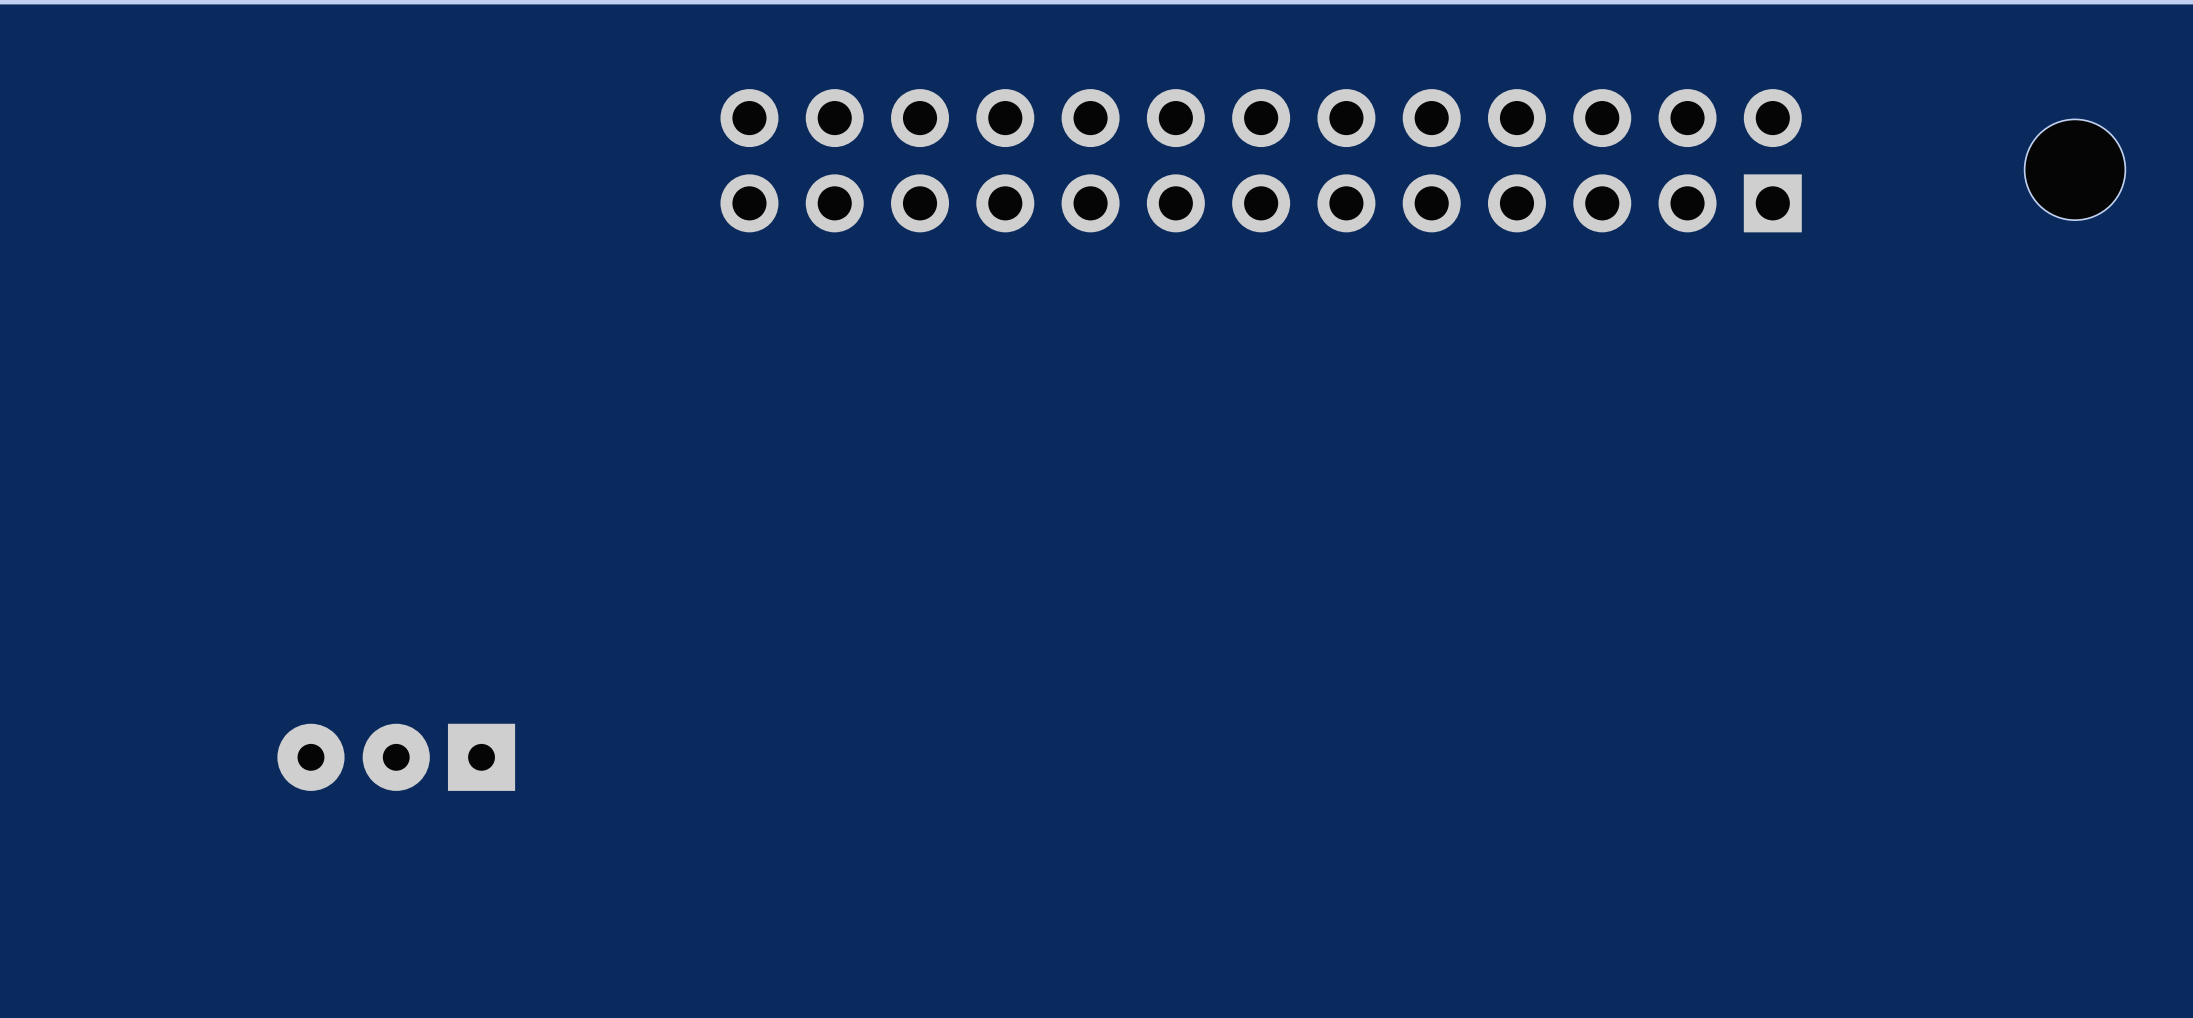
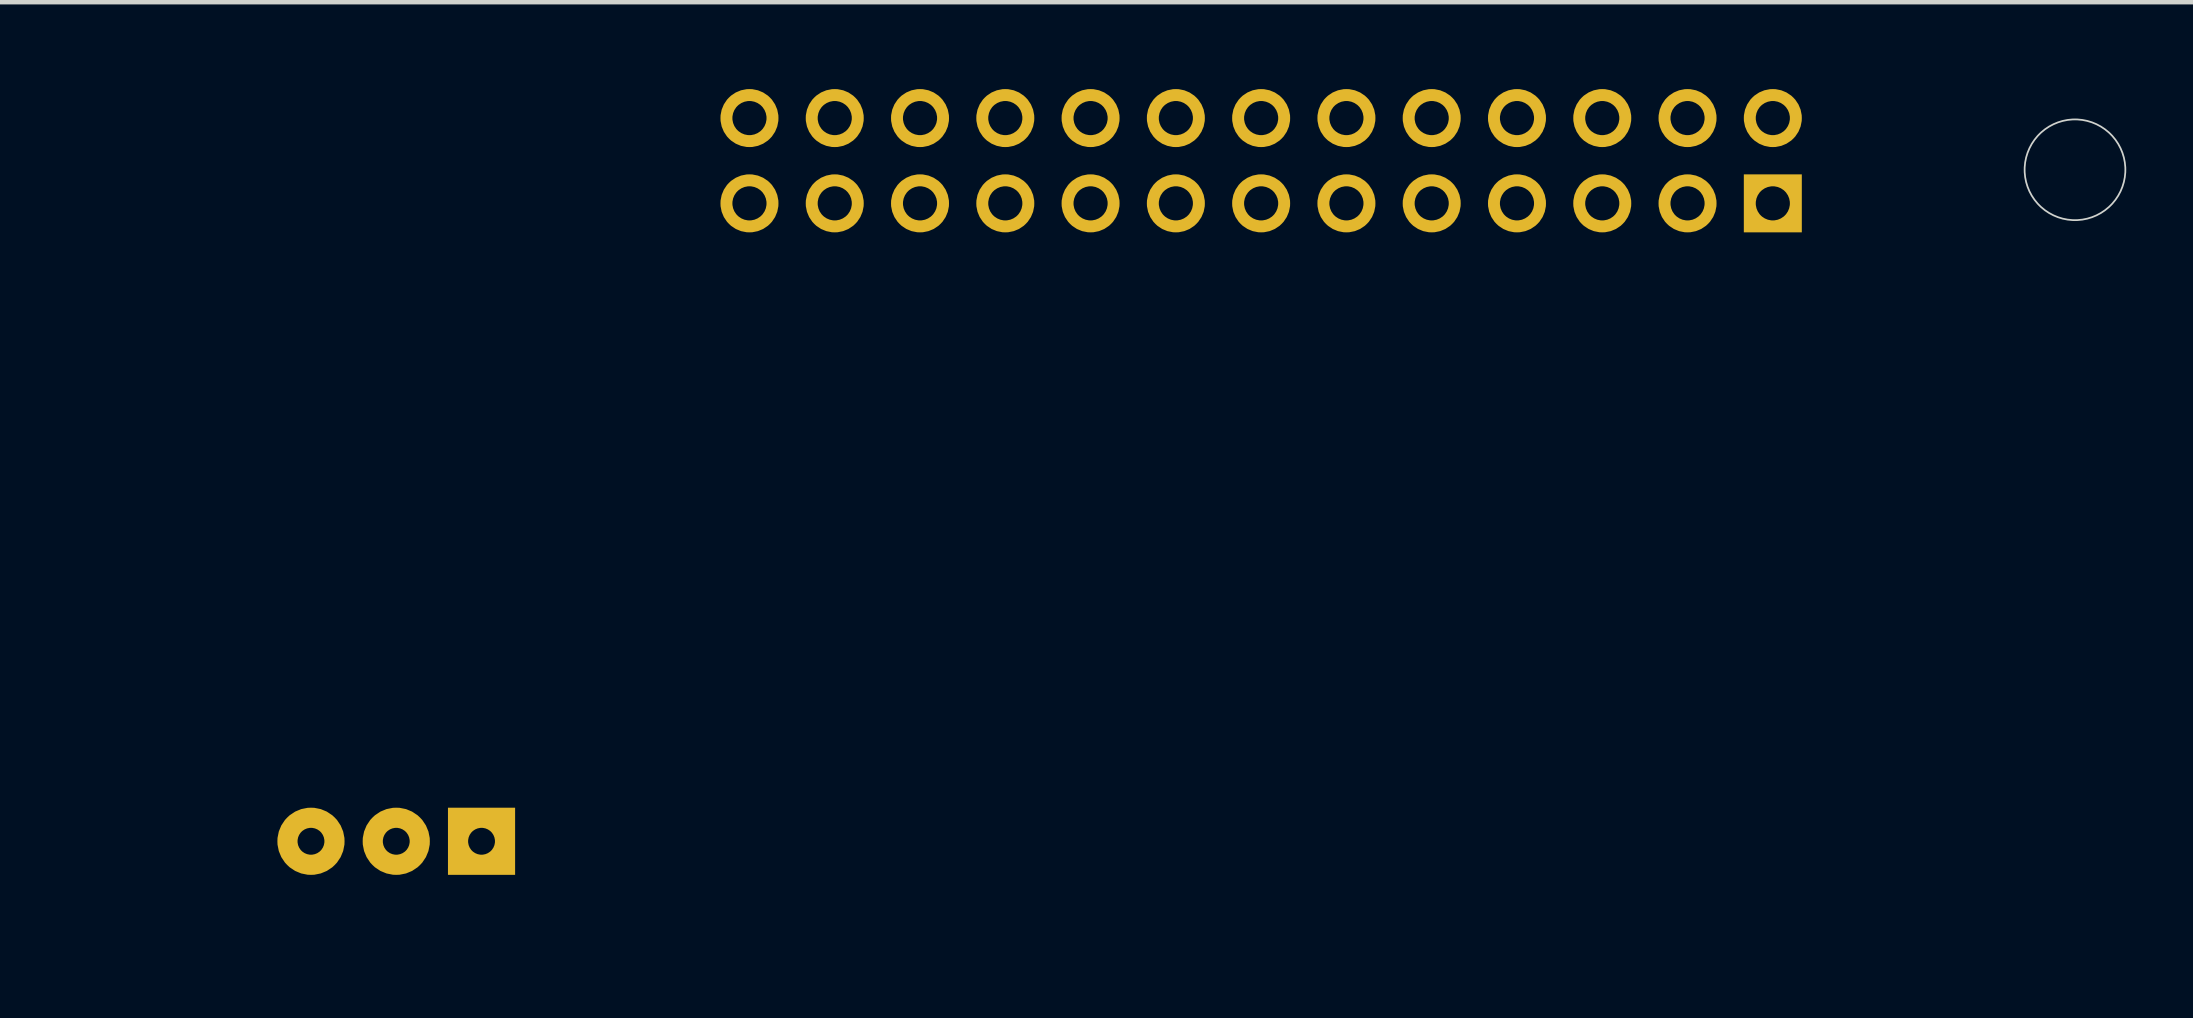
part position: (396, 757) -> (396, 841)

